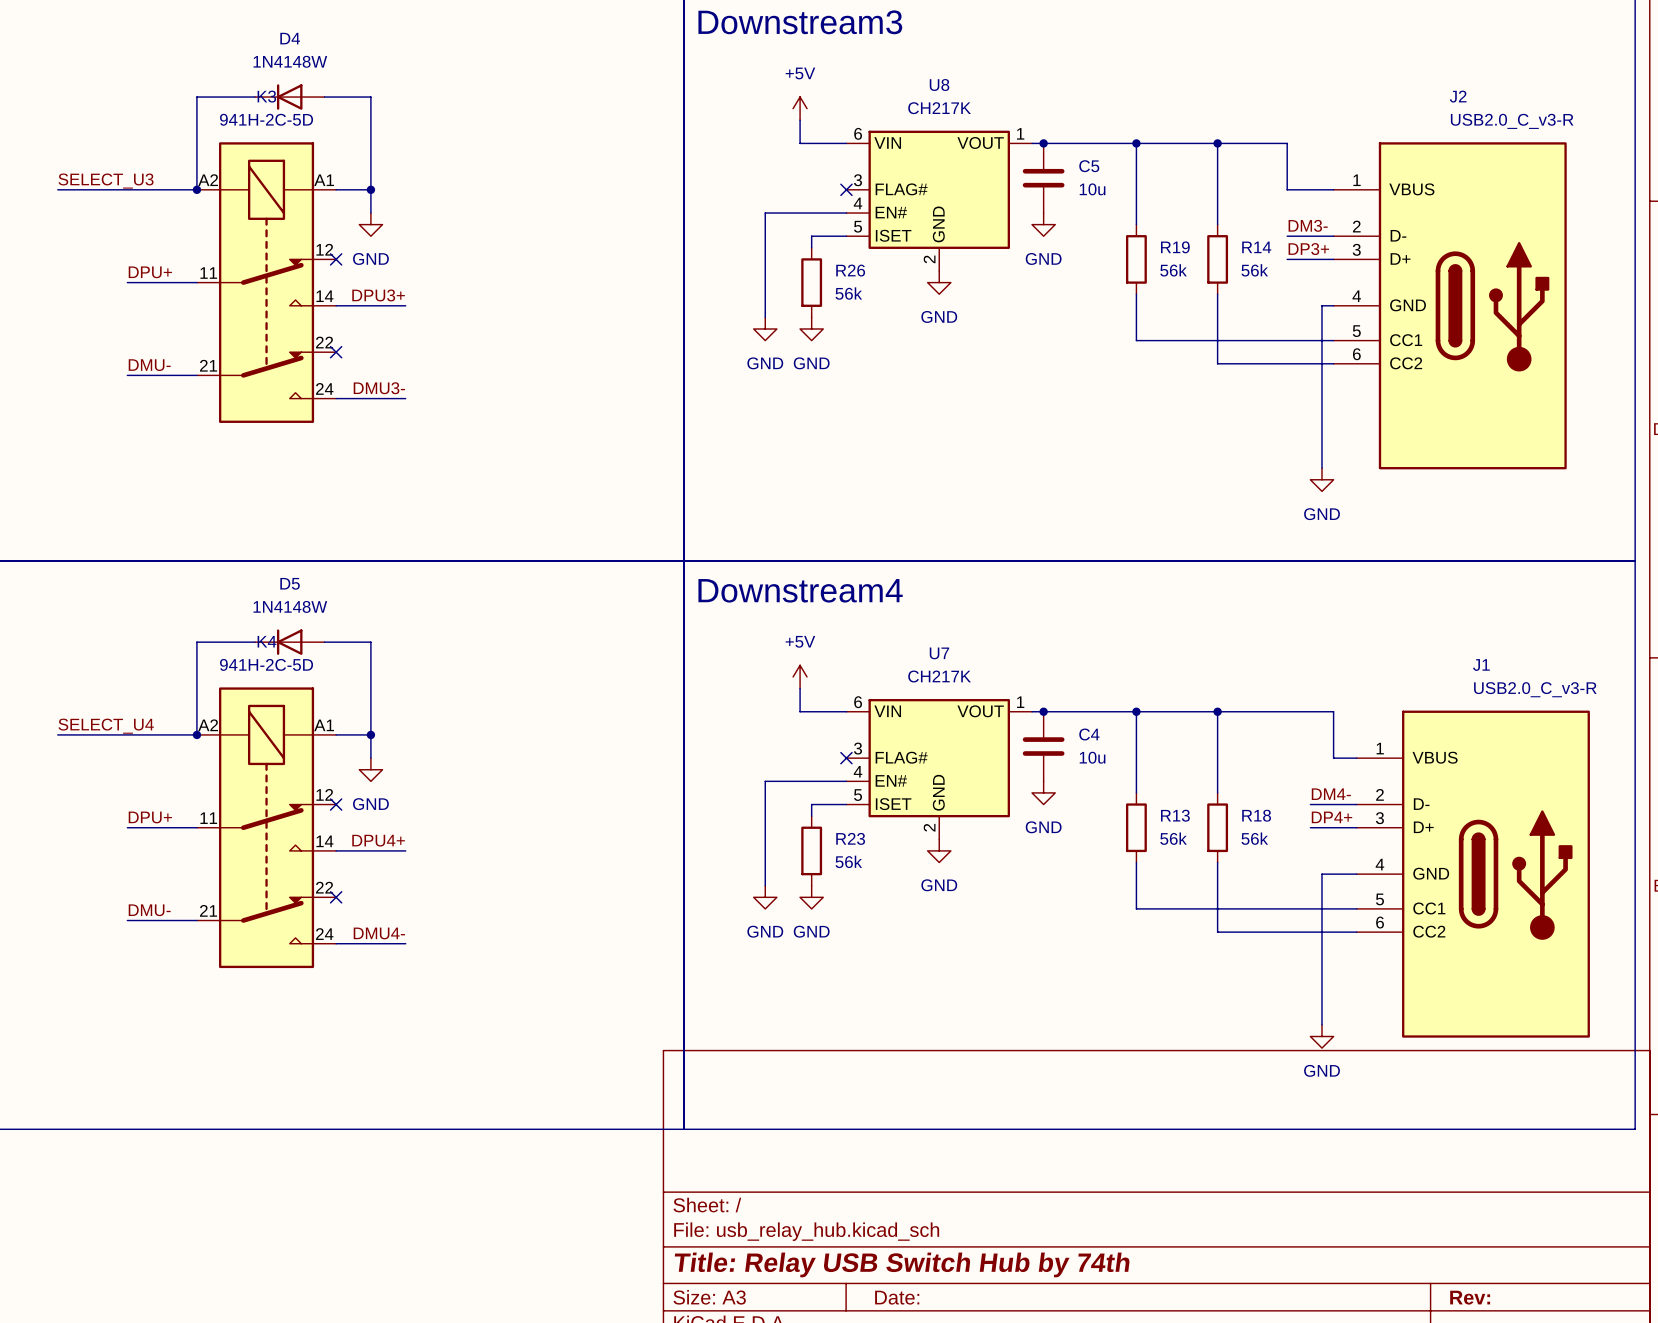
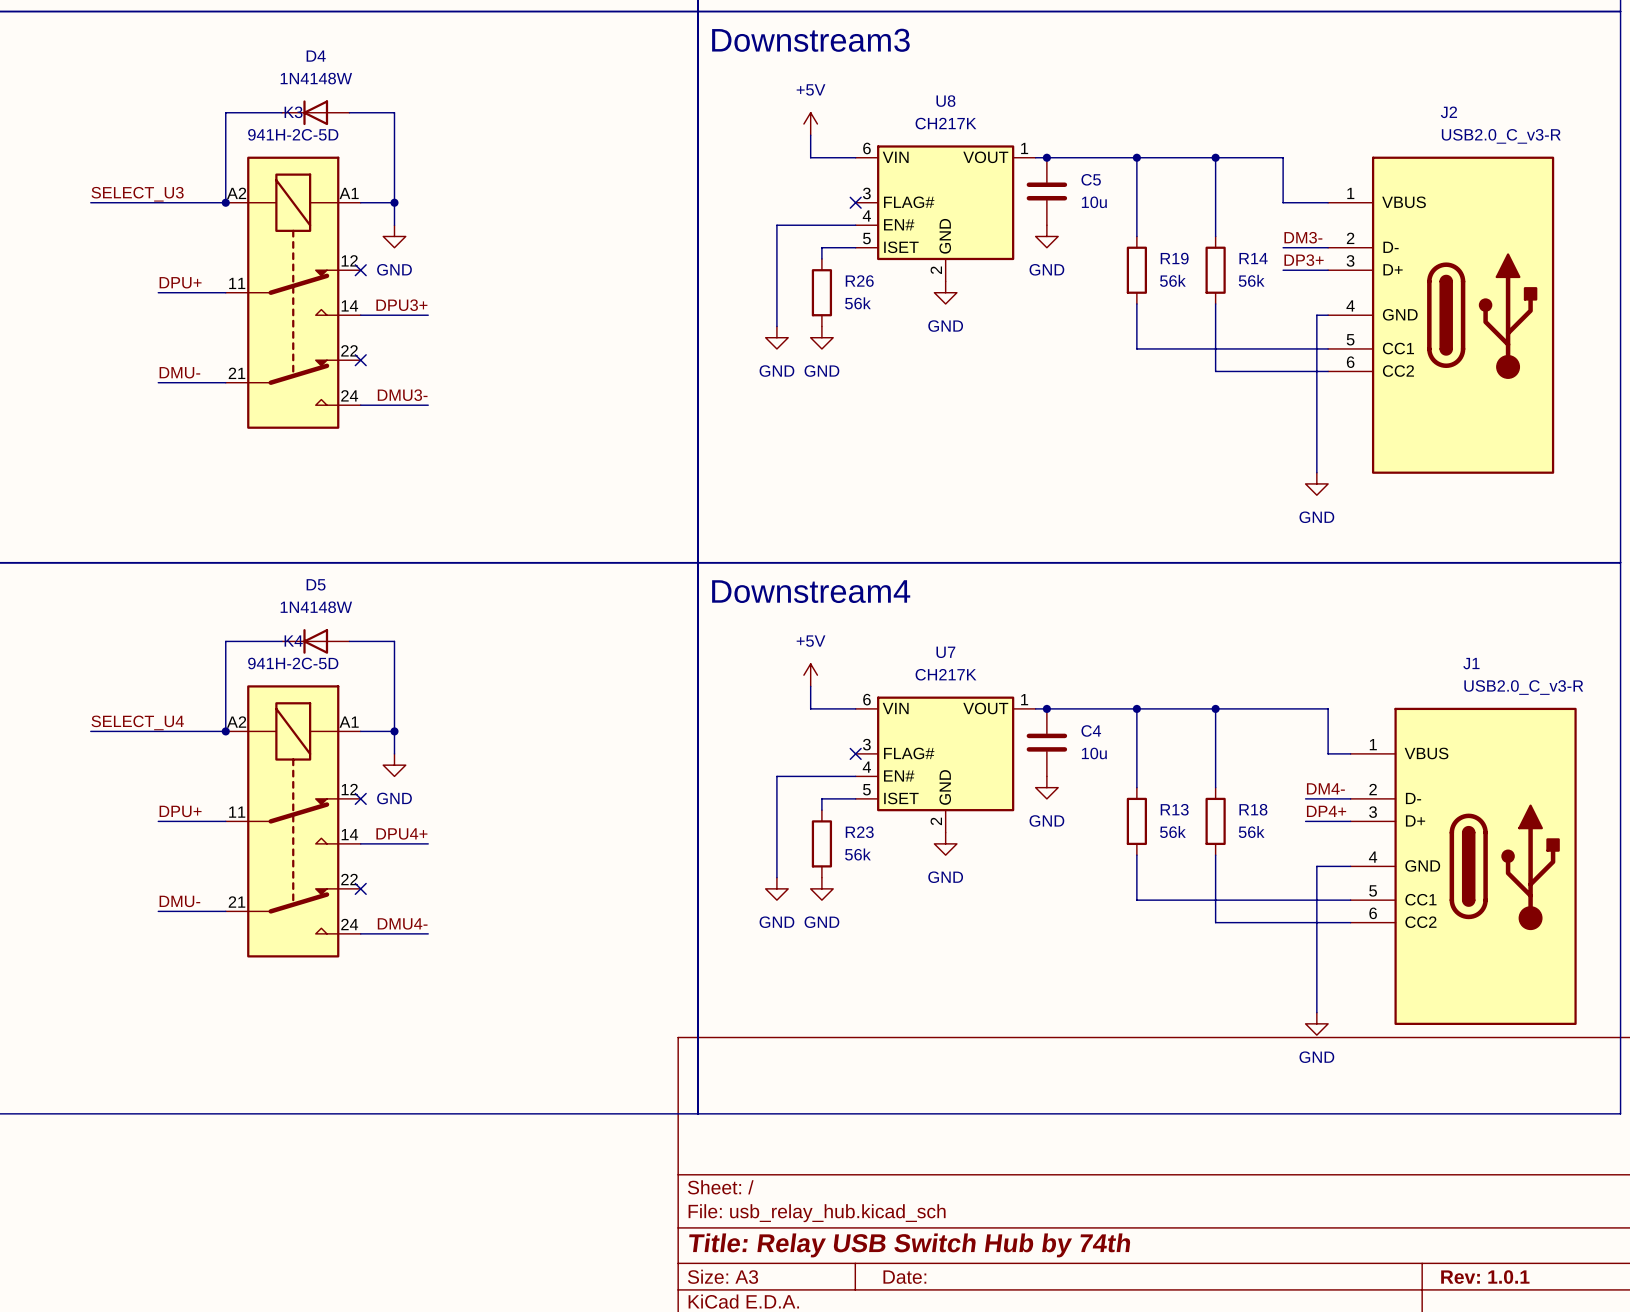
title block: Rev: (1470, 1297) -> Rev: 1.0.1 (1485, 1277)

